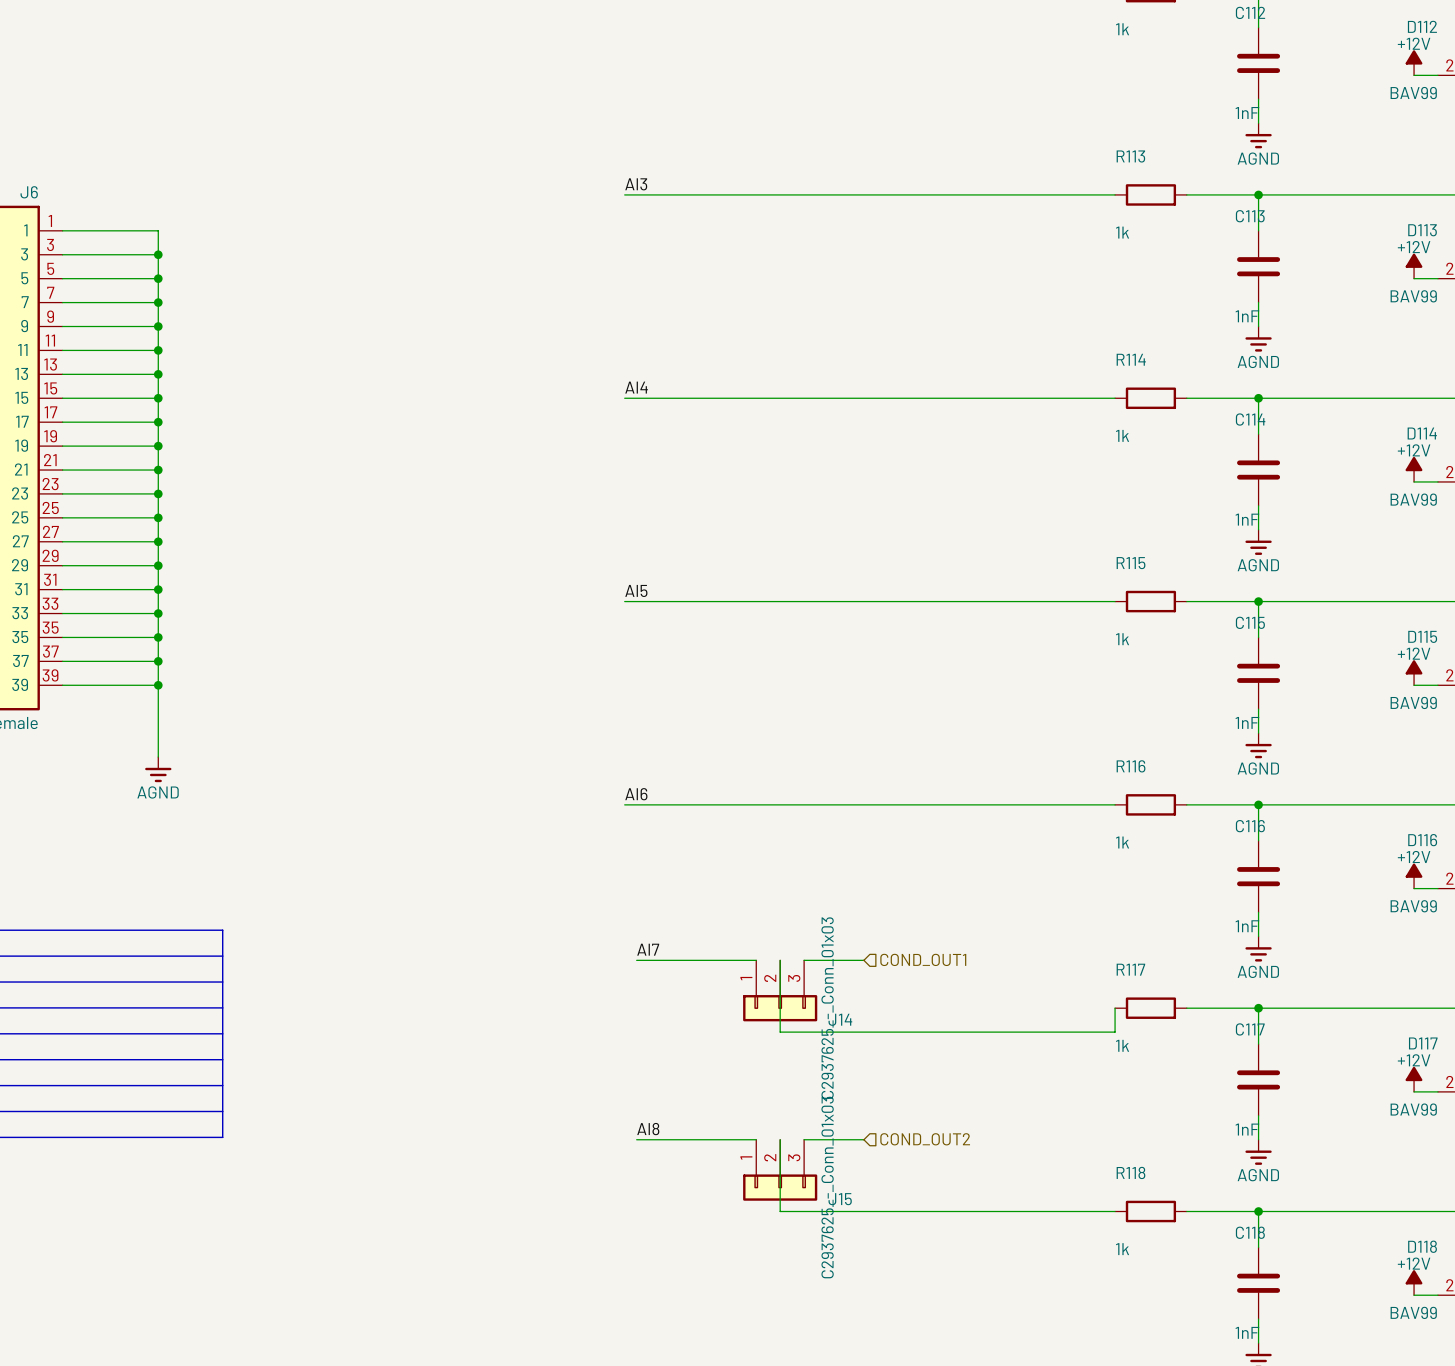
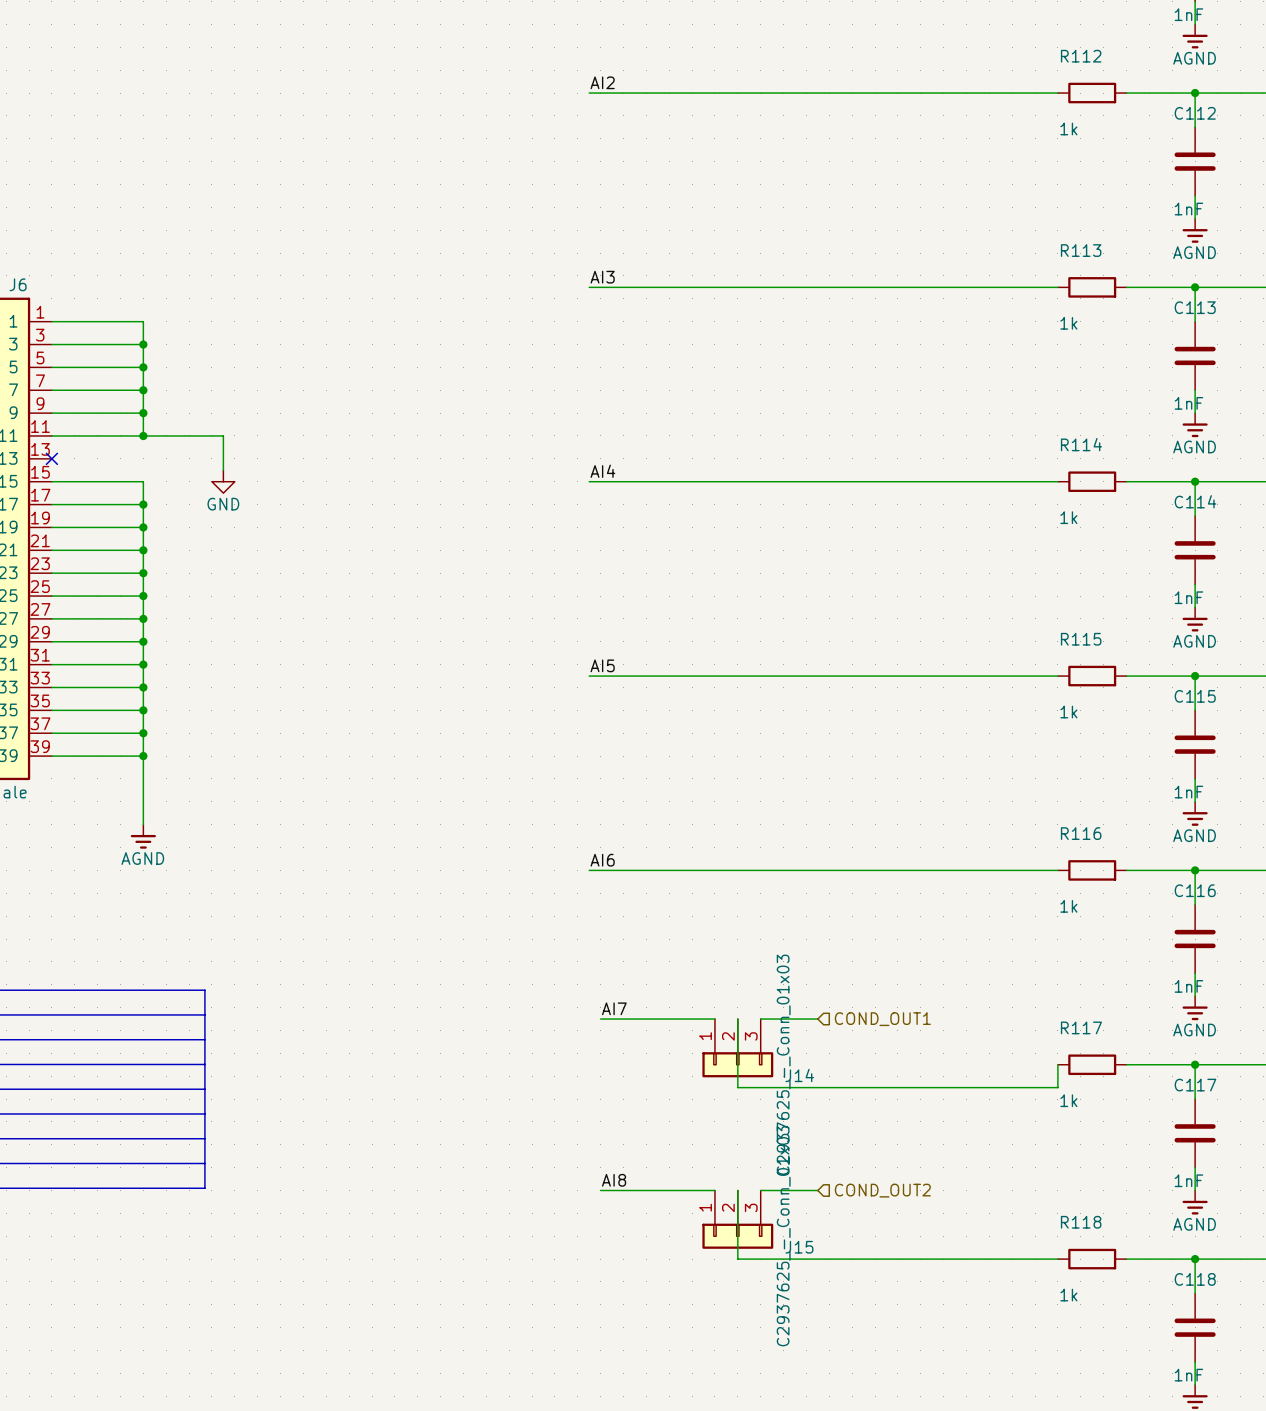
wire: (158, 350) (158, 398) -> (143, 435) (223, 435) (223, 470)
wire: (62, 374) (158, 374) -> none
no-connect mark: none -> (51, 458)
junction: (158, 374) -> none
junction: (158, 398) -> none
power symbol: none -> GND (223, 481)

